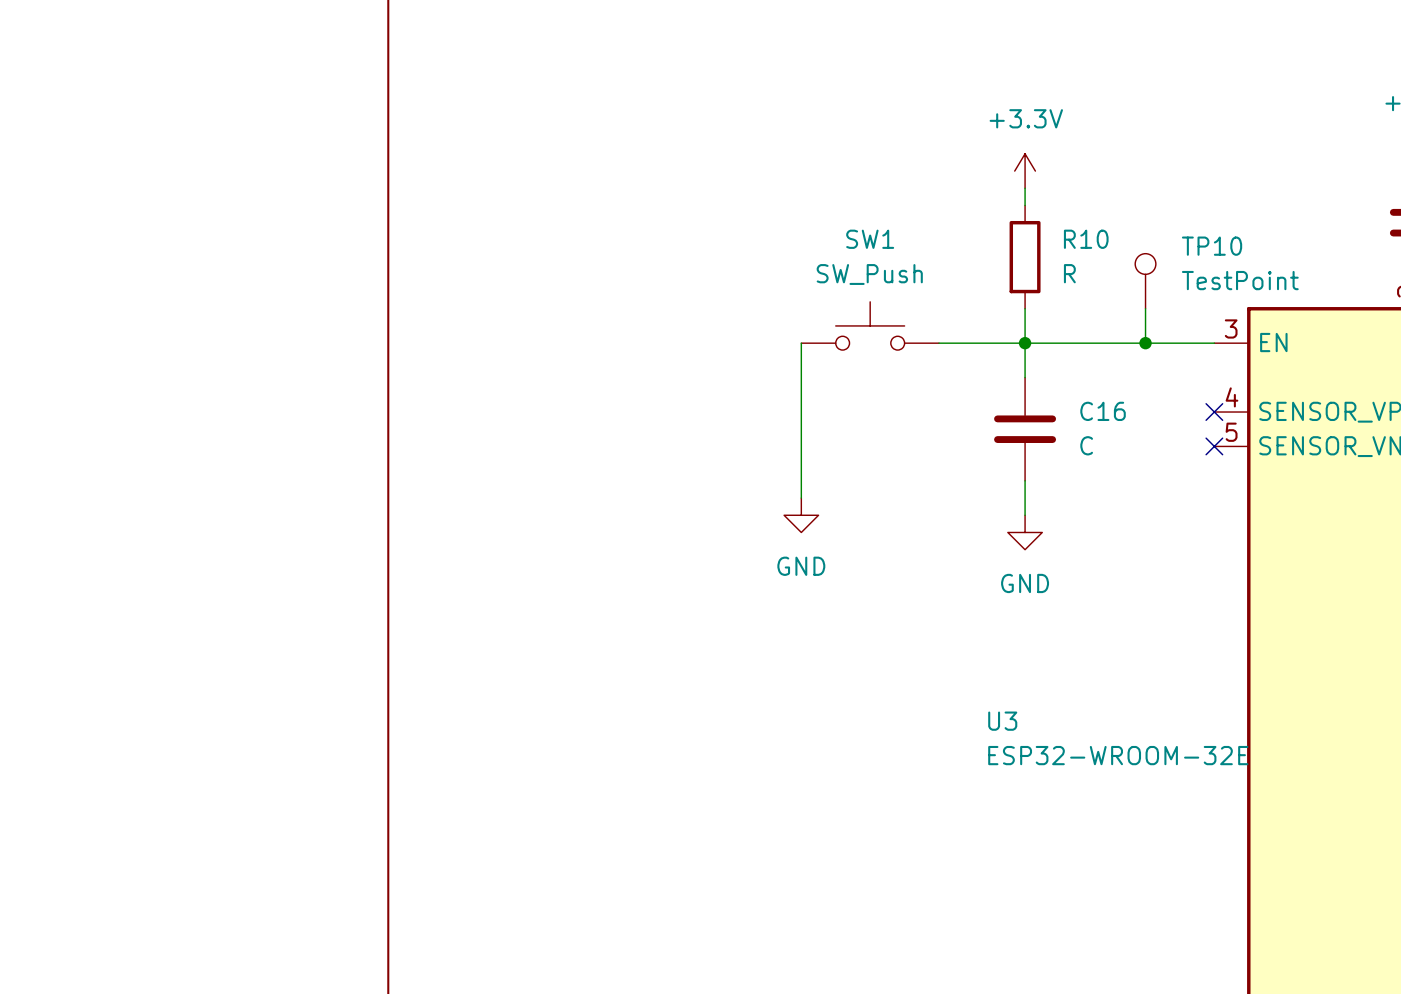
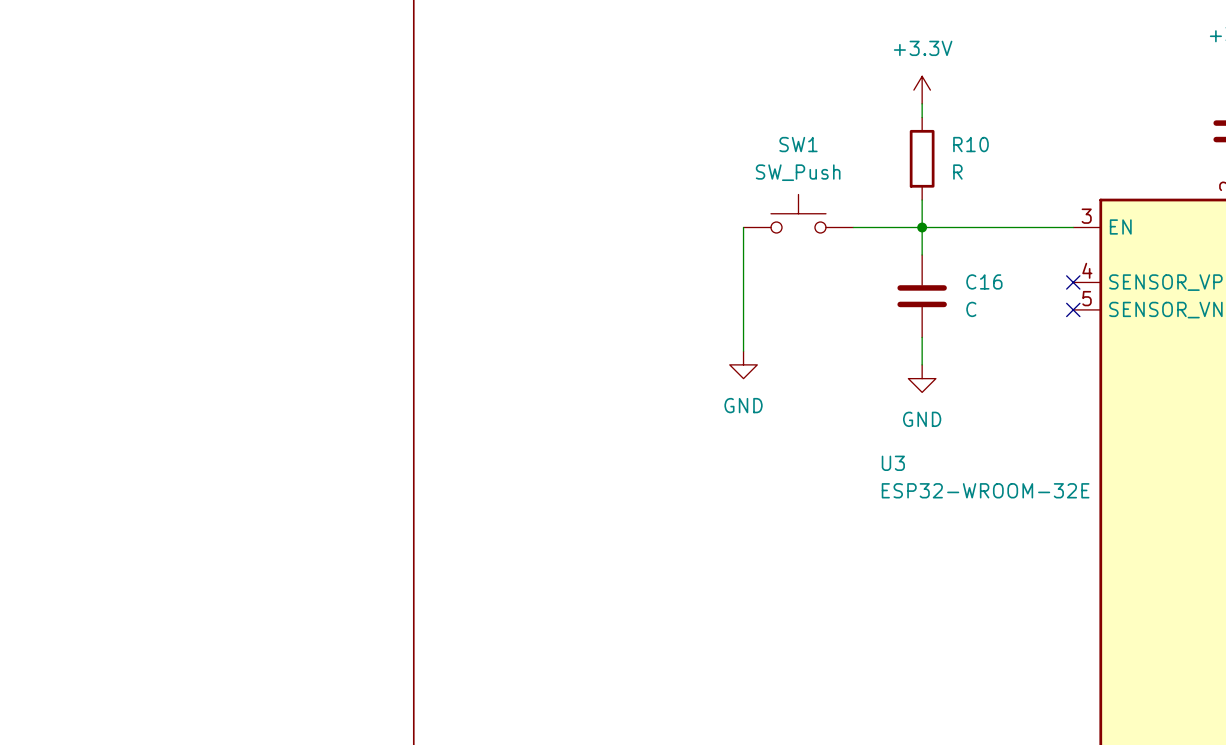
TP10: TestPoint (1145, 281) -> none
wire: (1145, 308) (1145, 343) -> none
junction: (1145, 343) -> none
U3 name position: U3 (1002, 721) -> U3 (893, 463)
U3 value position: ESP32-WROOM-32E (1118, 755) -> ESP32-WROOM-32E (985, 490)

